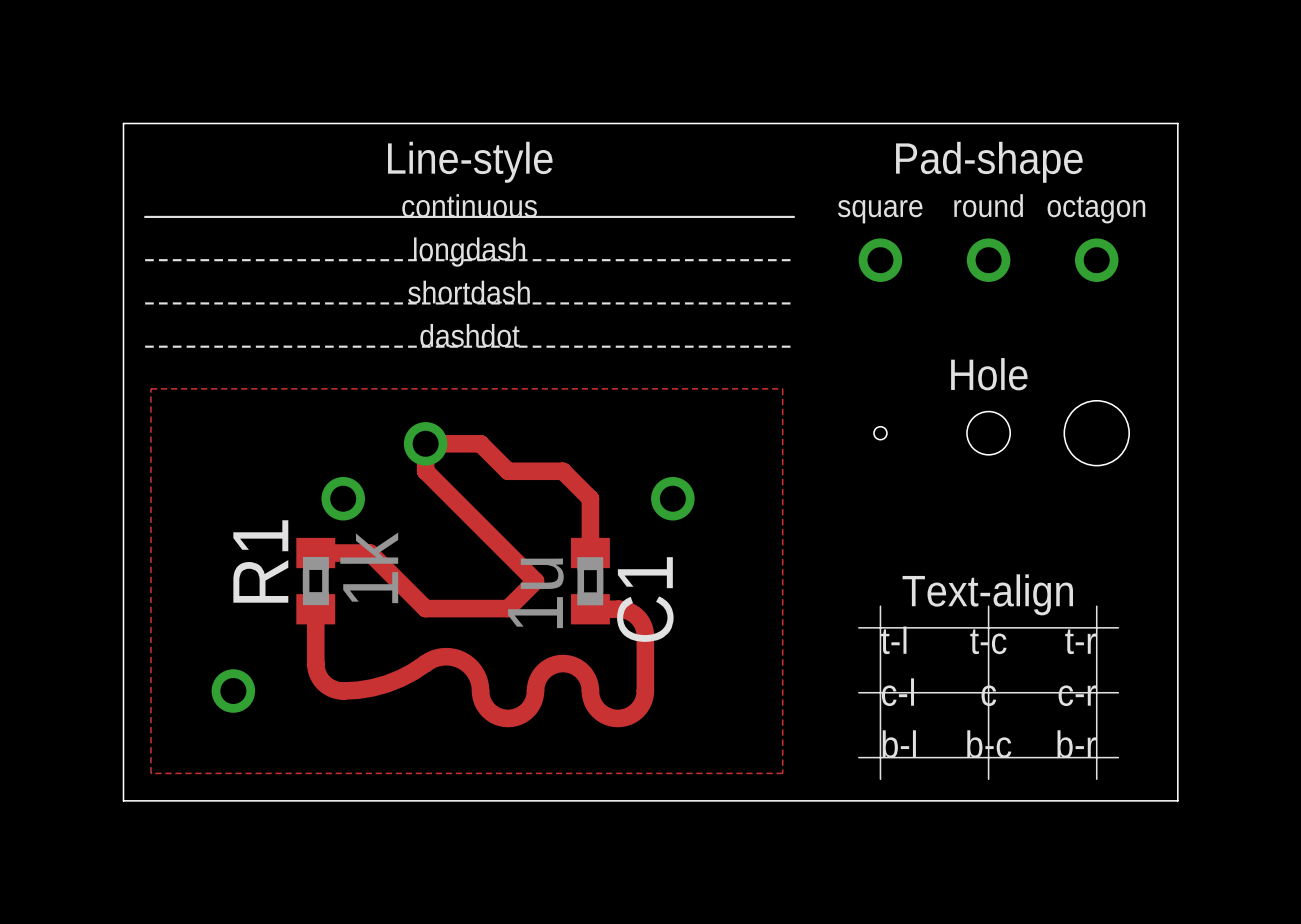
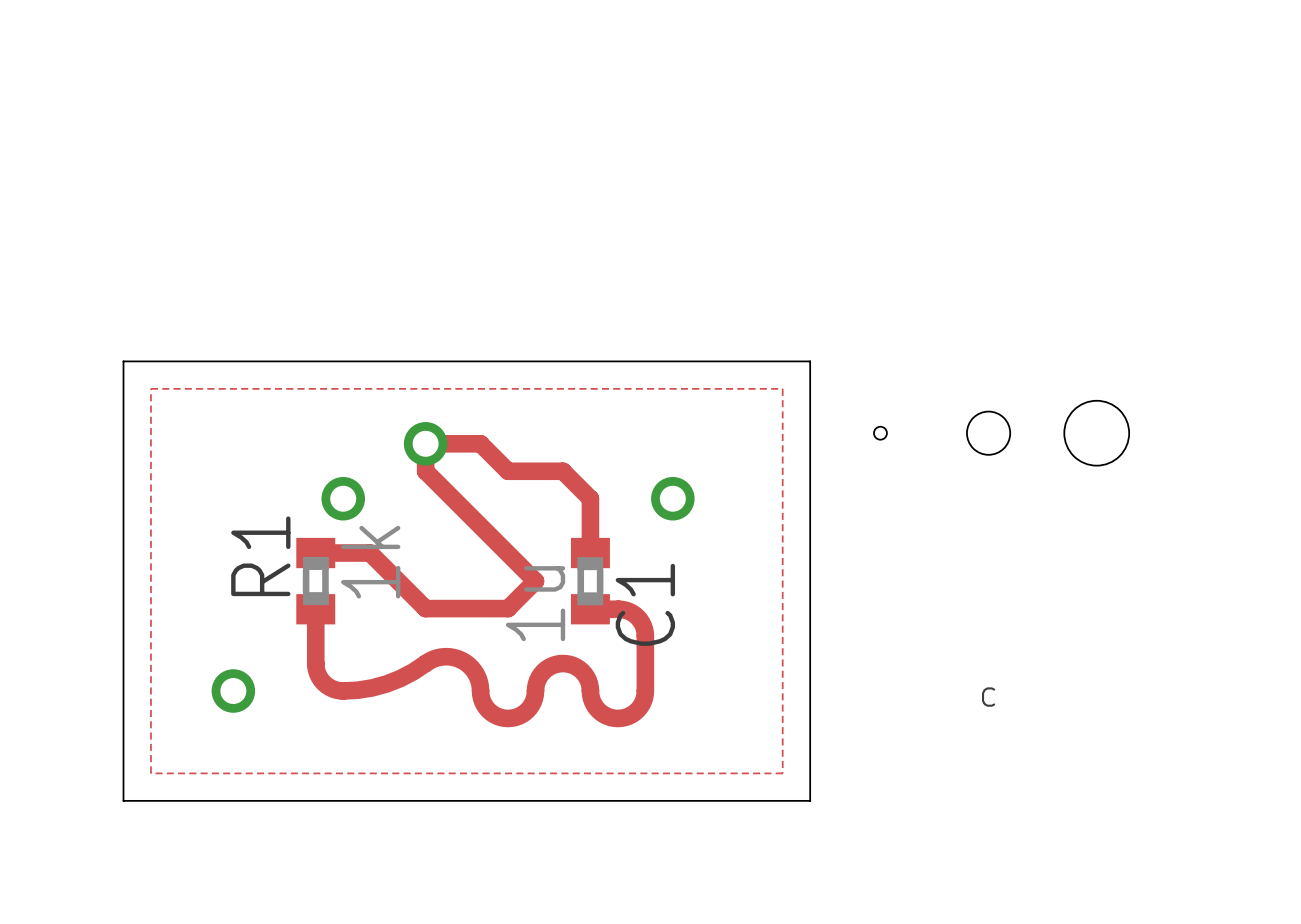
text: Line-style (470, 162) -> none
text: Pad-shape (989, 162) -> none
text: continuous (469, 205) -> none
text: round (988, 205) -> none
text: octagon (1096, 210) -> none
text: square (880, 211) -> none
line: (145, 216) (793, 216) -> none
text: longdash (469, 252) -> none
line: (145, 260) (793, 260) -> none
via: (880, 260) -> none
via: (988, 260) -> none
via: (1096, 260) -> none
text: shortdash (469, 292) -> none
line: (145, 303) (793, 303) -> none
text: dashdot (470, 335) -> none
line: (145, 346) (793, 346) -> none
board edge: (123, 361) (123, 123) (1177, 123) (1177, 800) (810, 800) -> (123, 361) (810, 361) (810, 800)
text: Hole (989, 374) -> none
text: Text-align (987, 594) -> none
line: (880, 606) (880, 779) -> none
line: (988, 606) (988, 779) -> none
line: (1096, 606) (1096, 779) -> none
line: (858, 627) (1118, 627) -> none
text: t-l (893, 640) -> none
text: t-c (988, 641) -> none
text: t-r (1080, 641) -> none
line: (858, 692) (1118, 692) -> none
text: c-l (897, 692) -> none
text: c-r (1077, 695) -> none
text: b-l (899, 744) -> none
text: b-c (989, 744) -> none
text: b-r (1076, 744) -> none
line: (858, 757) (1118, 757) -> none

